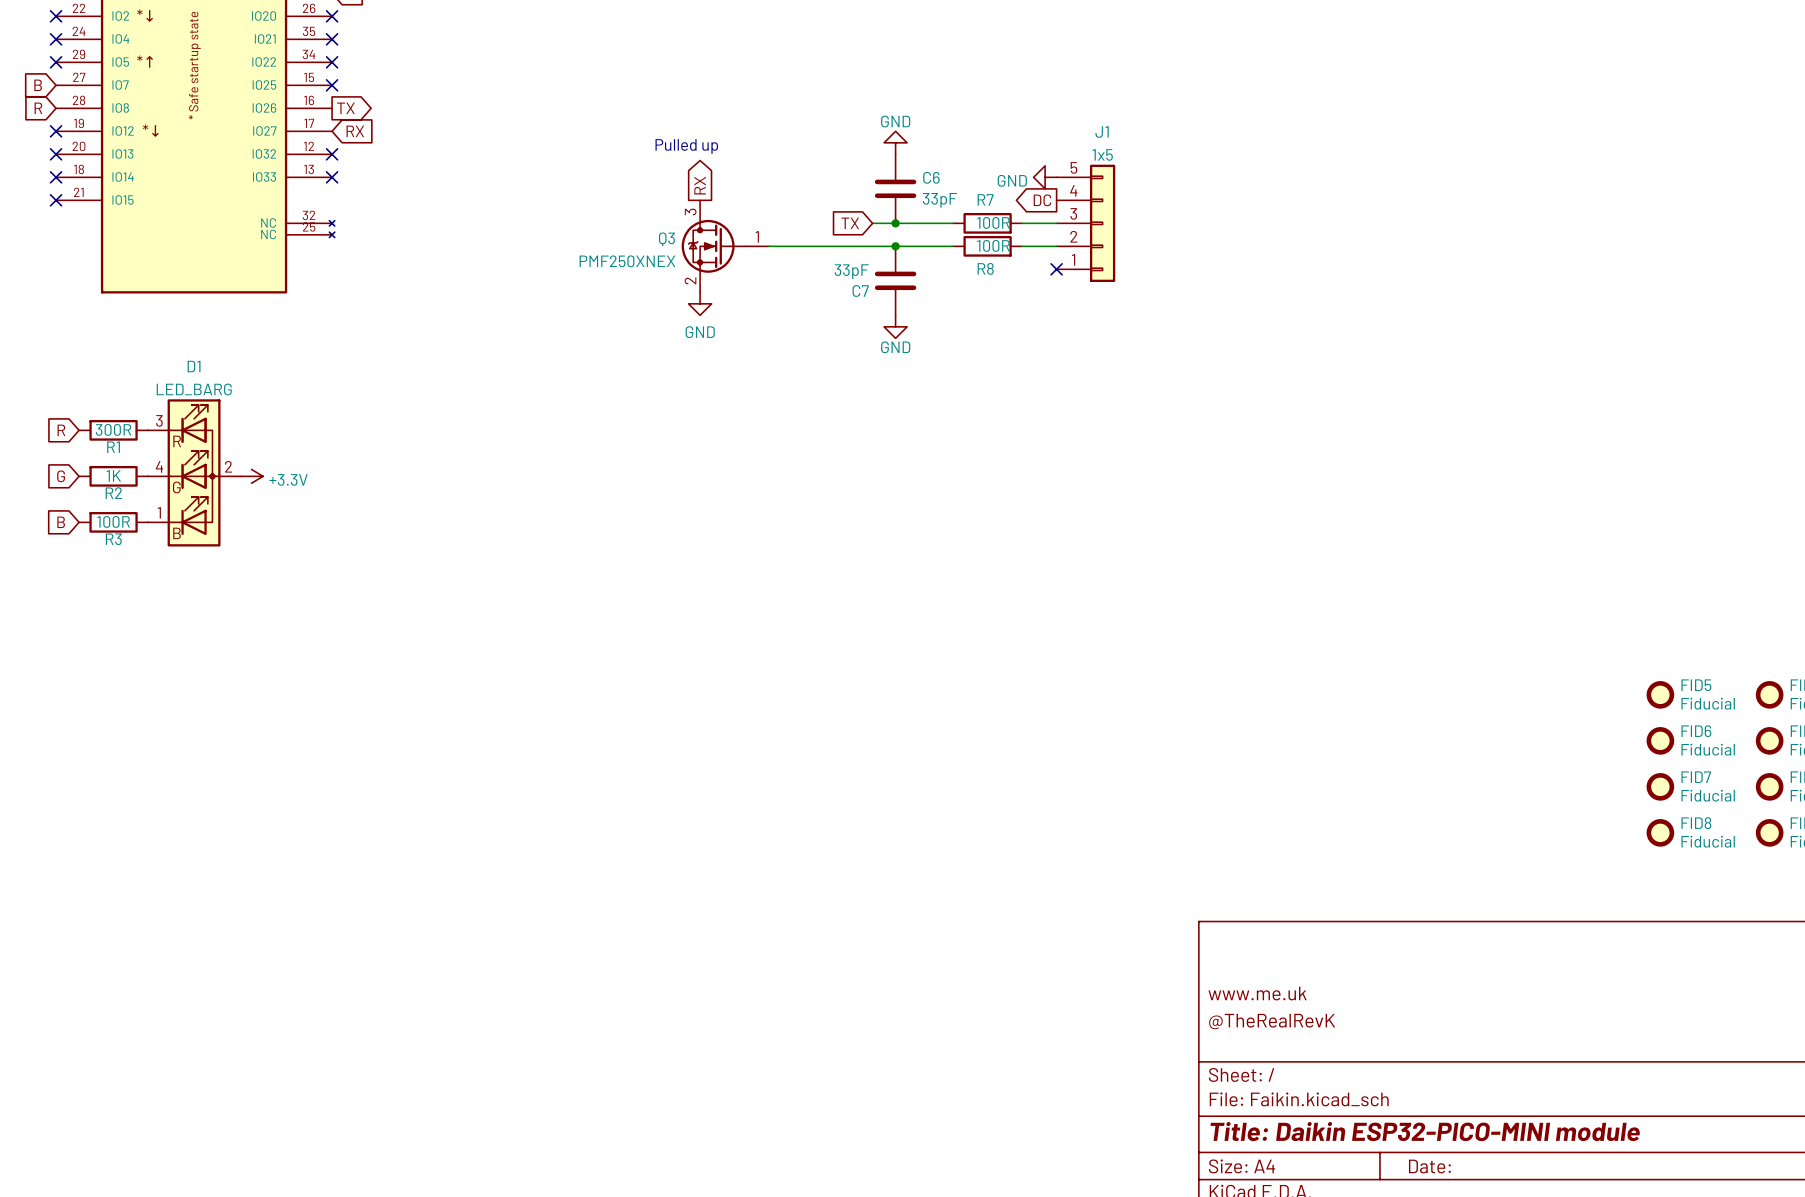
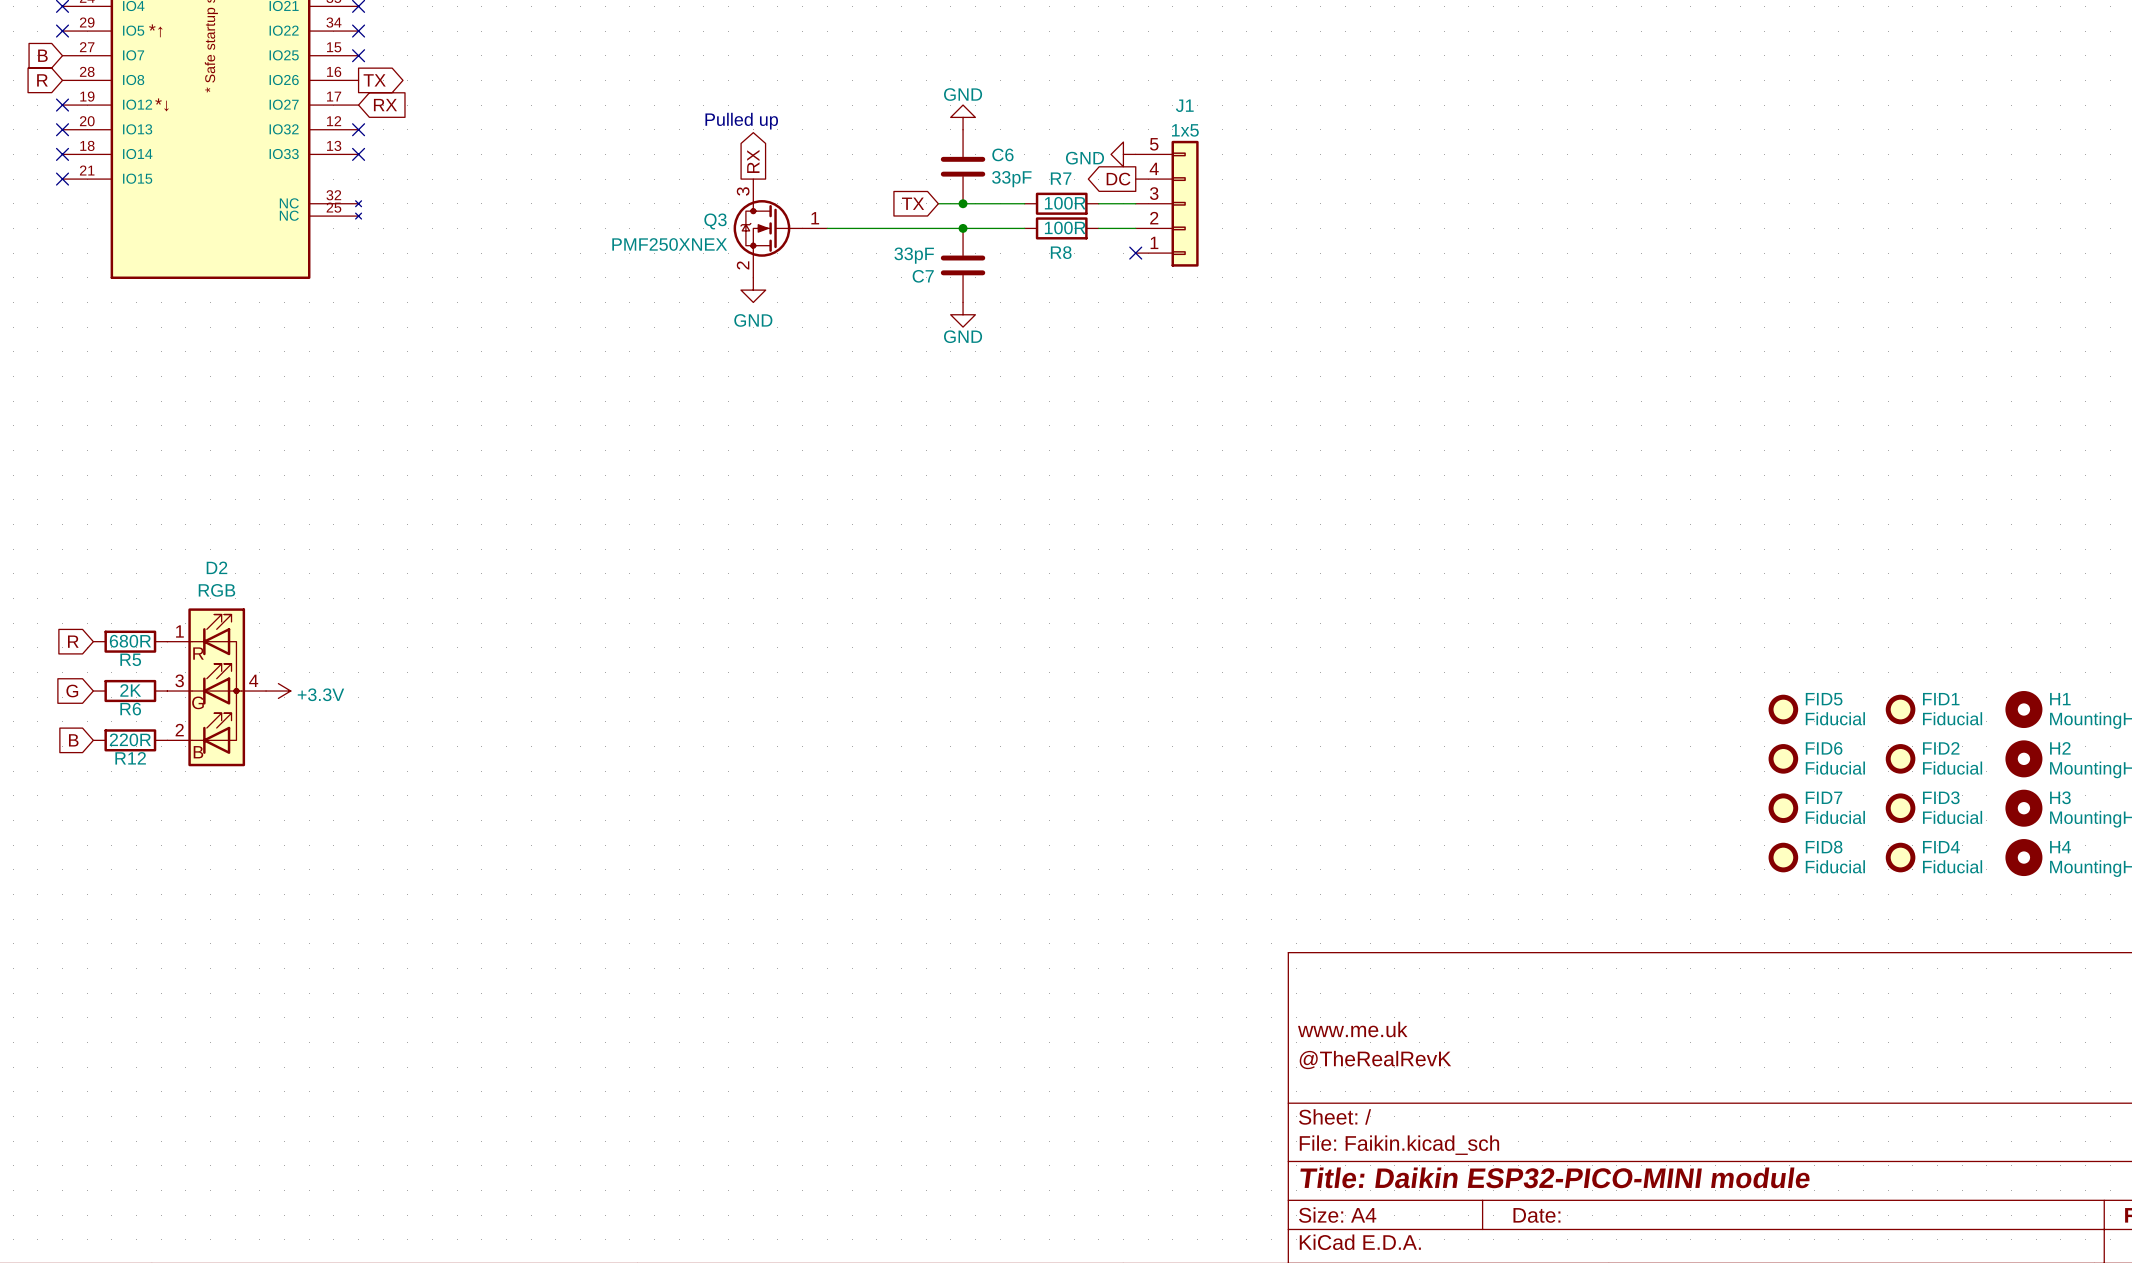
global label position: R (61, 430) -> R (73, 641)
R1: 300R (113, 430) -> none
D1: LED_BARG (194, 472) -> none
global label position: G (61, 476) -> G (72, 691)
R2: 1K (113, 476) -> none
power symbol position: +3.3V (251, 476) -> +3.3V (278, 691)
global label position: B (61, 522) -> B (73, 740)
R3: 100R (113, 522) -> none
R5: none -> 680R (130, 641)
D2: none -> RGB (216, 687)
R6: none -> 2K (130, 691)
R12: none -> 220R (130, 740)

